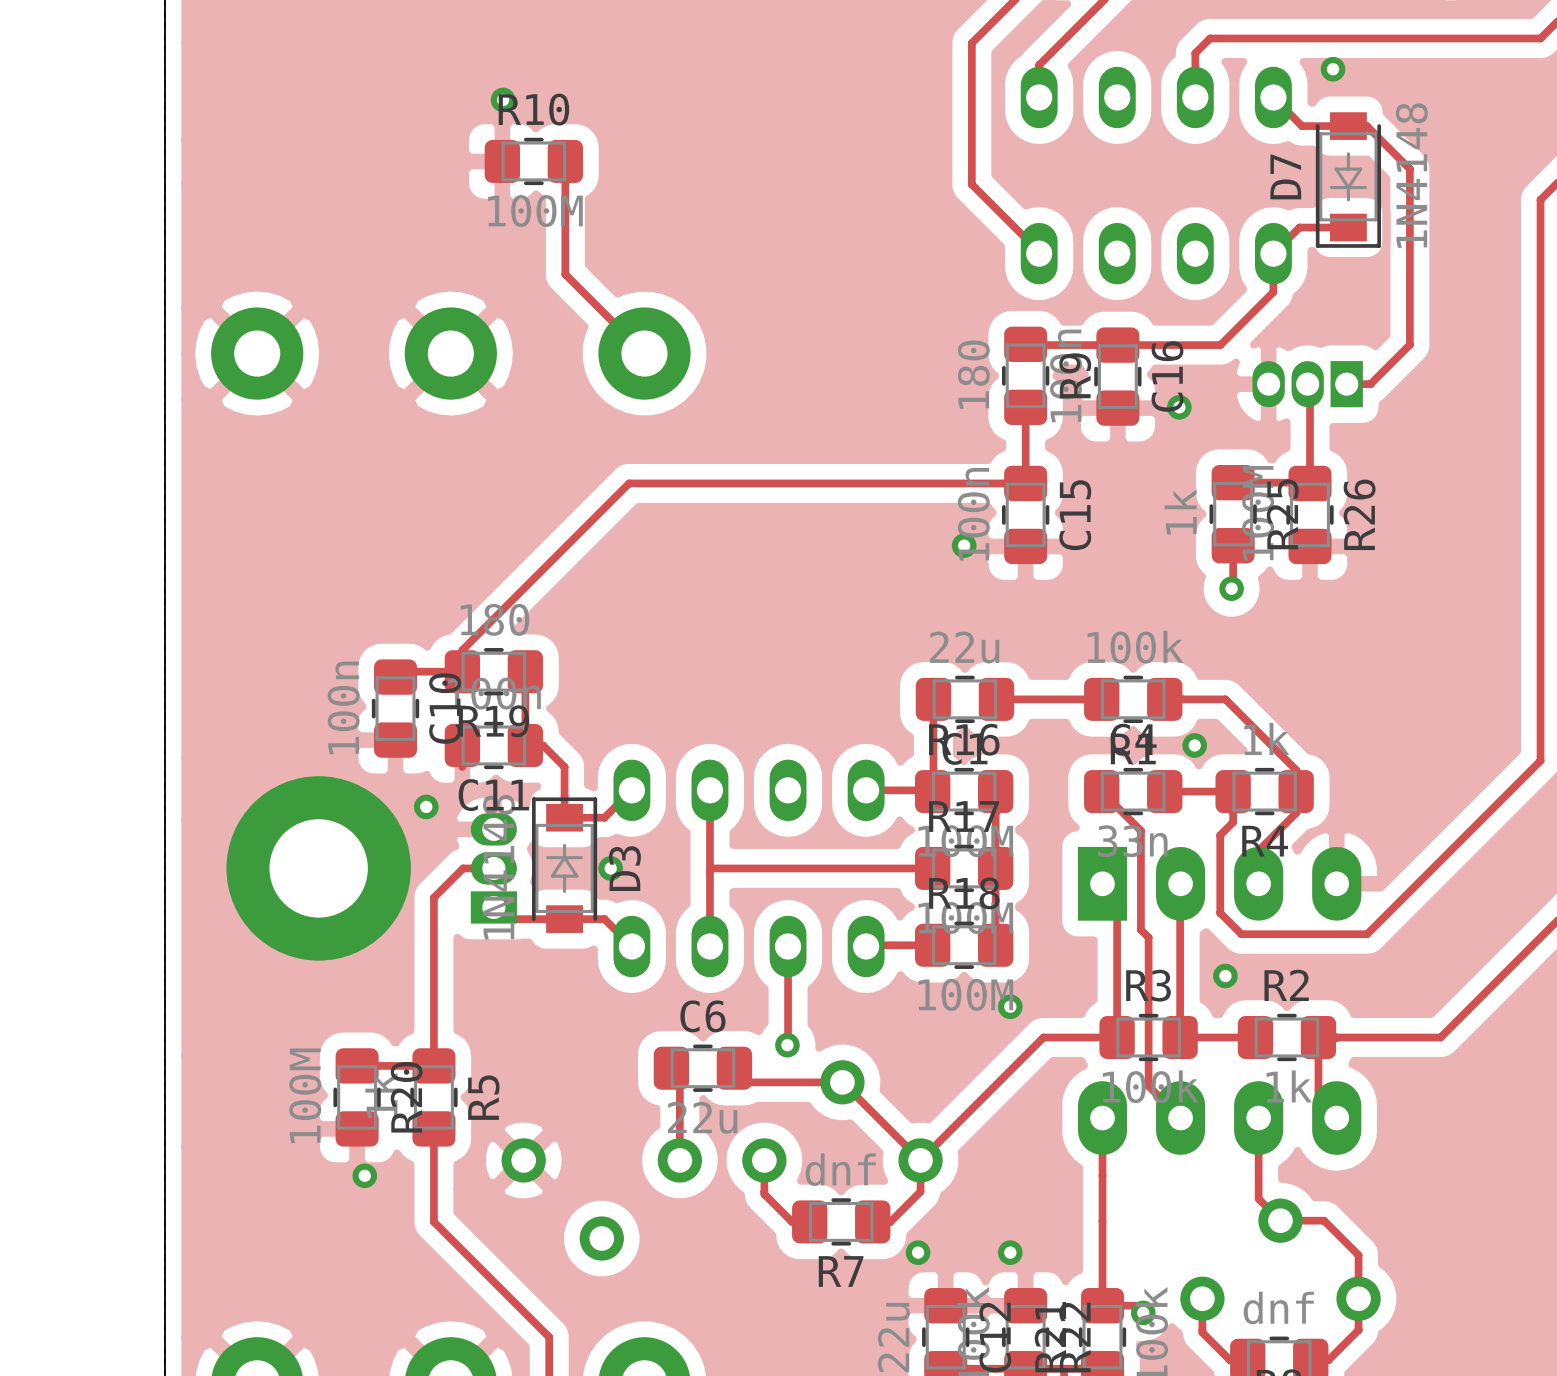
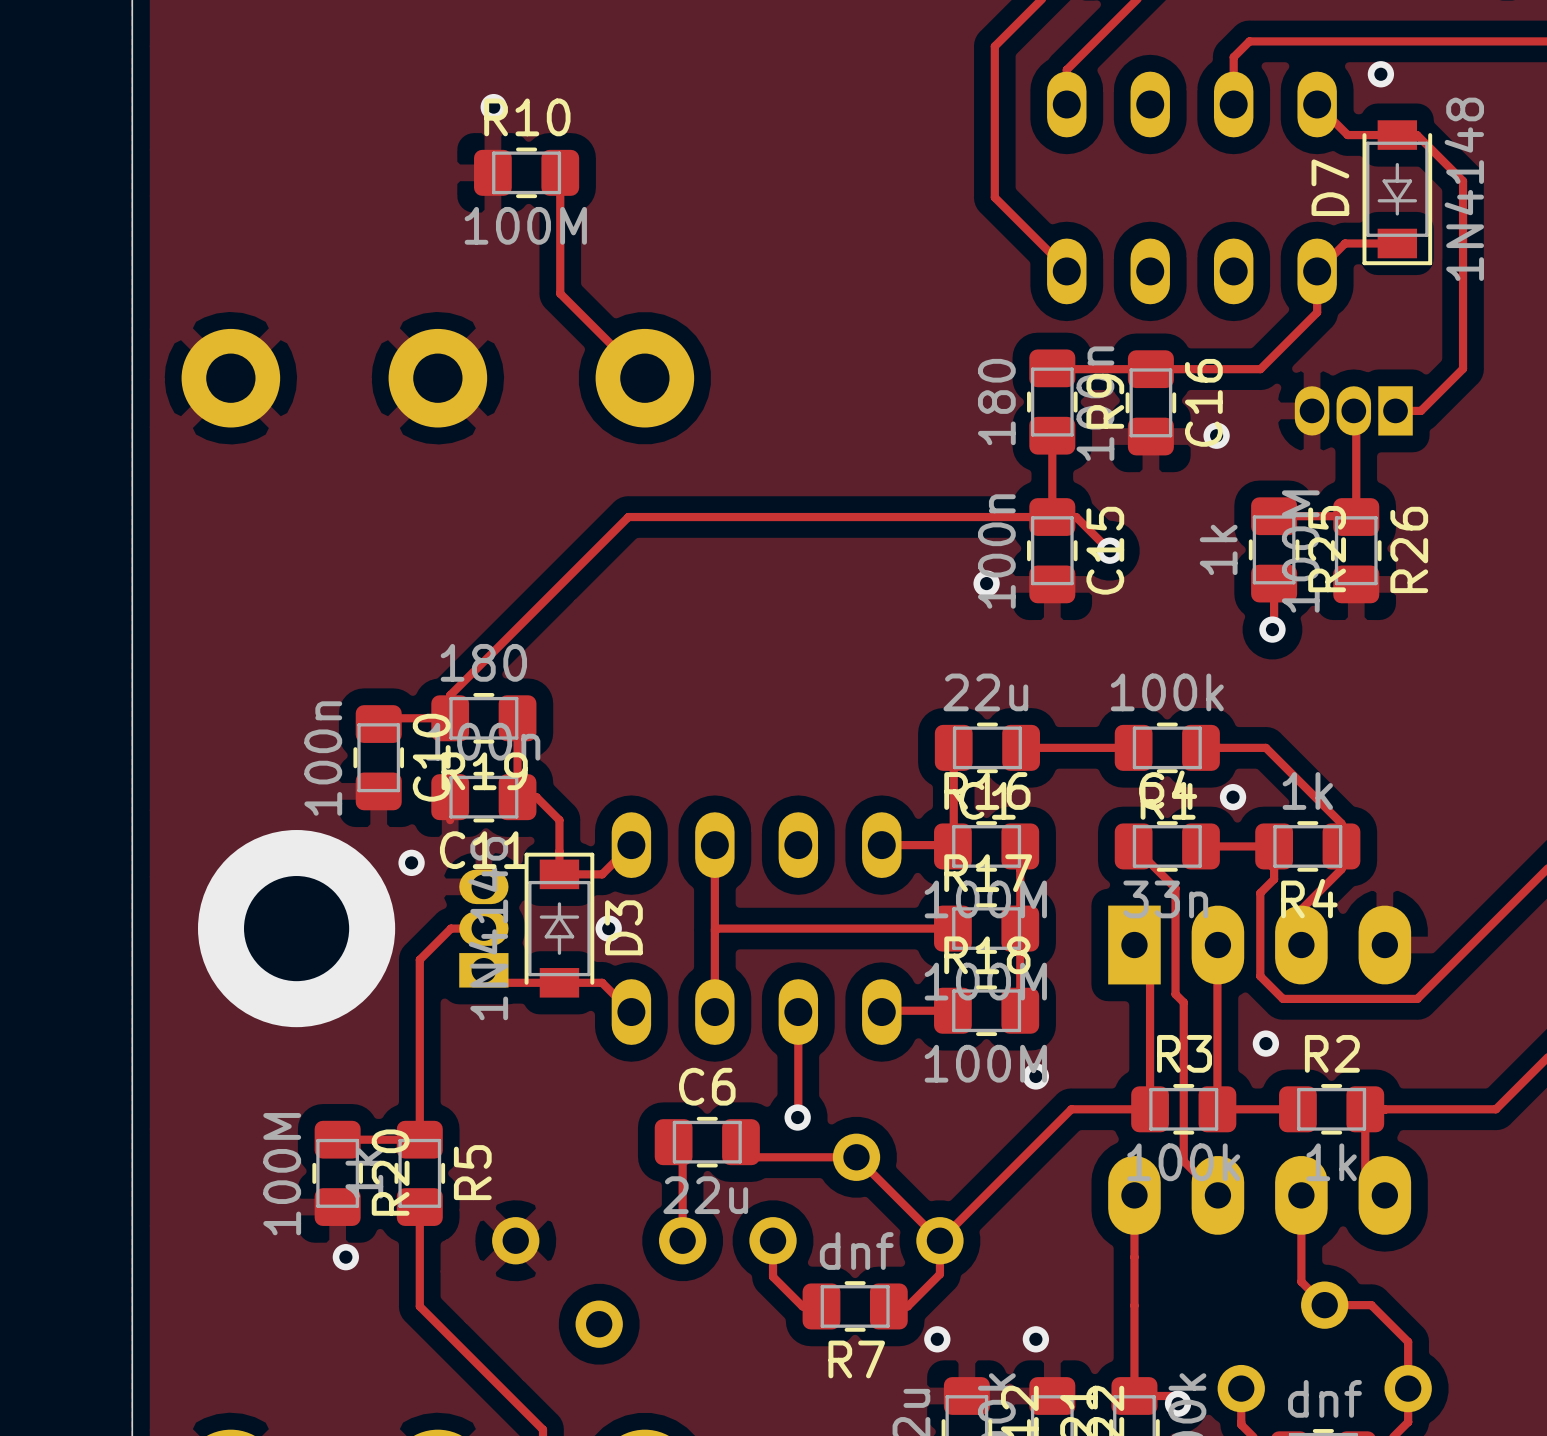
track: none -> (1052, 517) (1076, 517) (1109, 550)
via: none -> (1109, 550)

